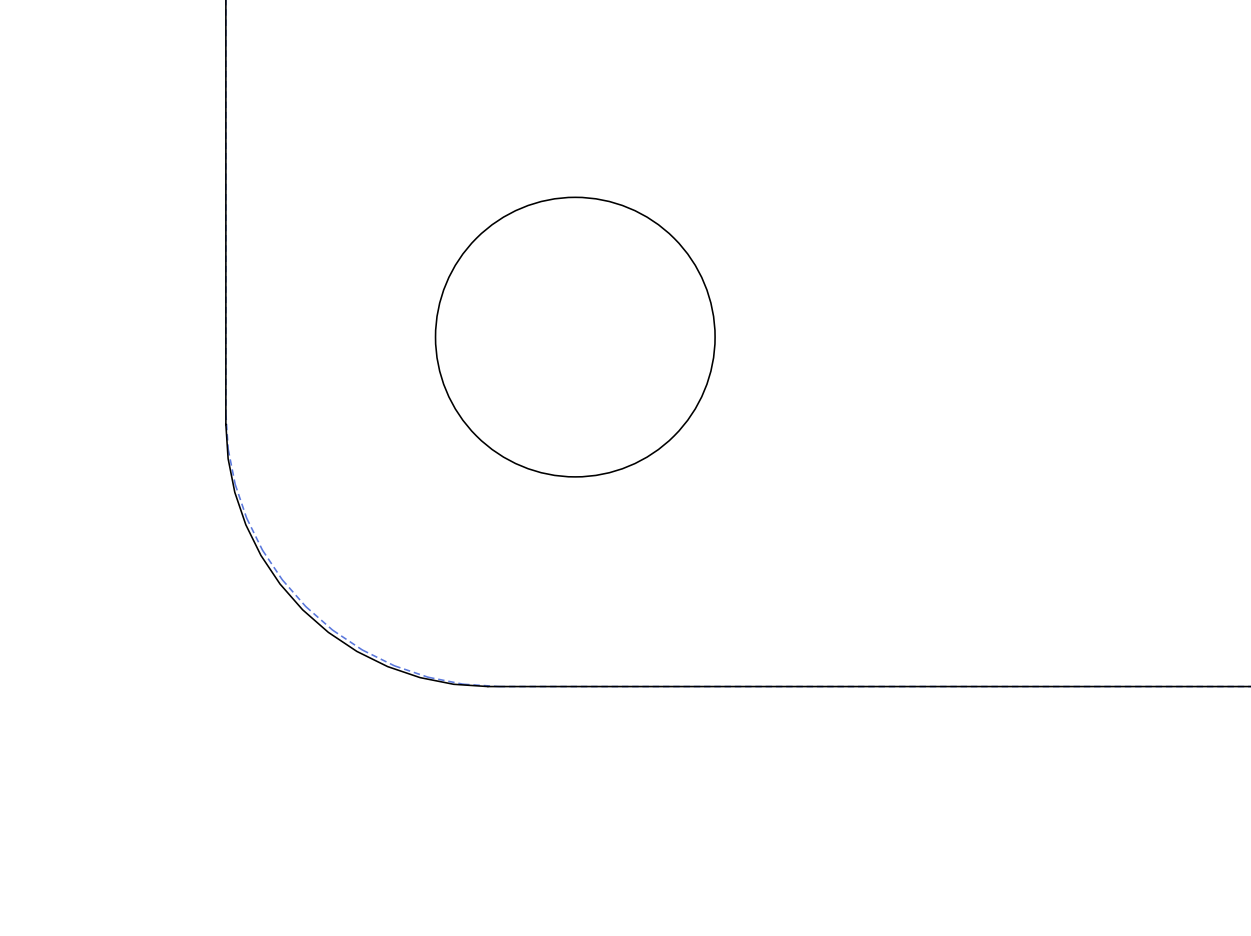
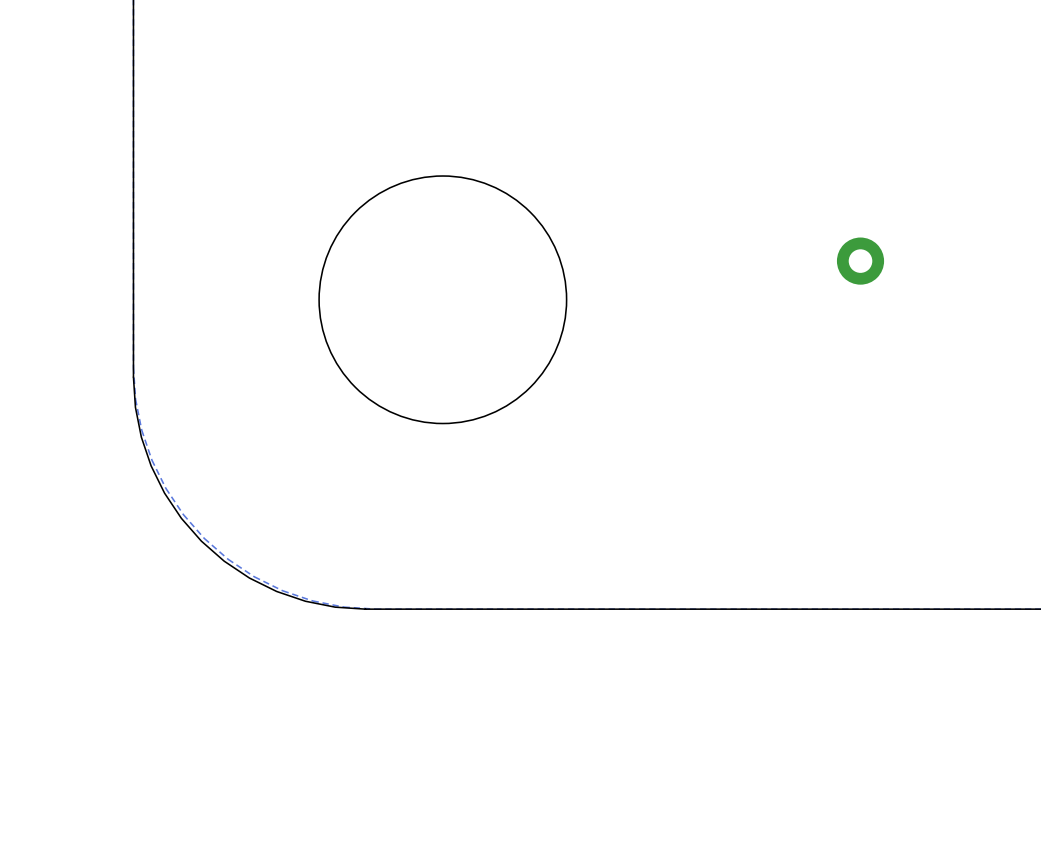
via: none -> (860, 261)

